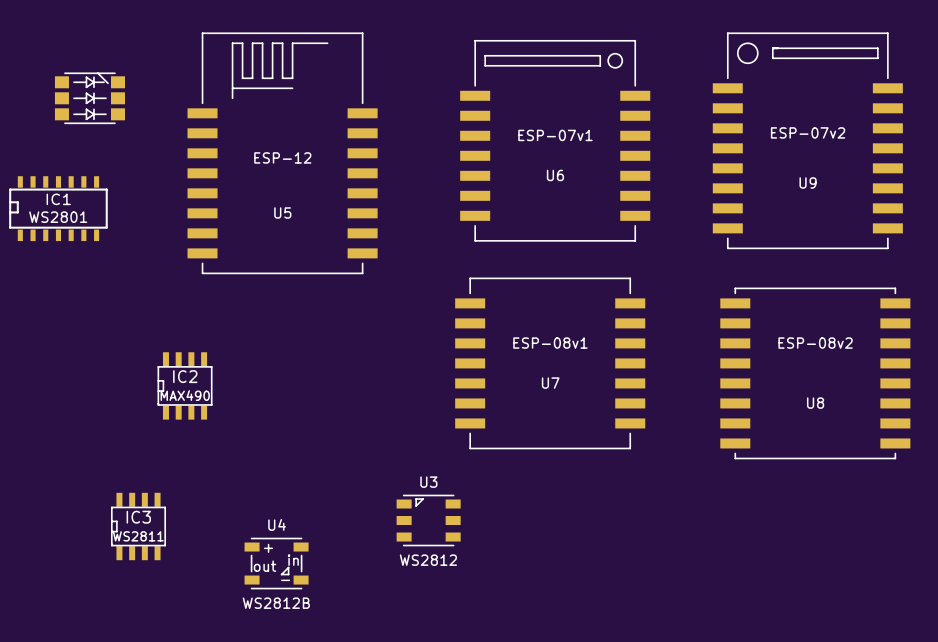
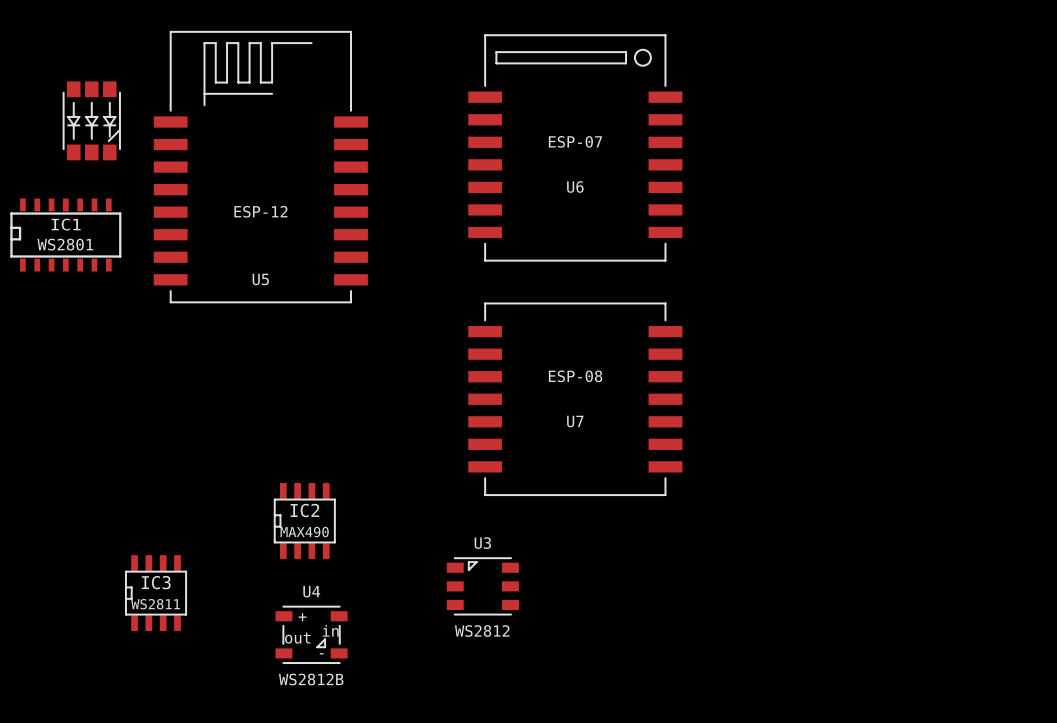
part rotation: 0° (89, 98) -> 90° clockwise (91, 120)
U6 value: ESP-07v1 (555, 135) -> ESP-07 (575, 141)
U6 position: (555, 140) -> (575, 147)
U9: ESP-07v2 (807, 140) -> none
U5 position: (282, 153) -> (260, 167)
U5 value position: ESP-12 (282, 157) -> ESP-12 (260, 211)
U5 name position: U5 (282, 212) -> U5 (260, 279)
U7 value: ESP-08v1 (550, 343) -> ESP-08 (575, 376)
U7 position: (550, 363) -> (575, 399)
U8: ESP-08v2 (815, 373) -> none
IC2 position: (185, 385) -> (304, 520)

